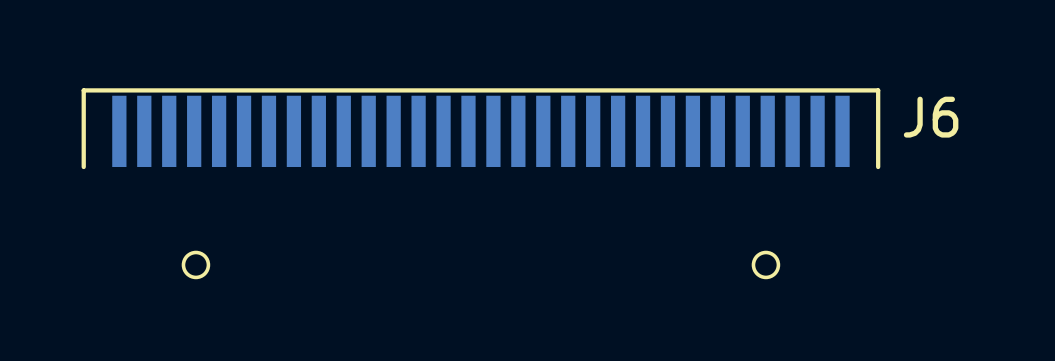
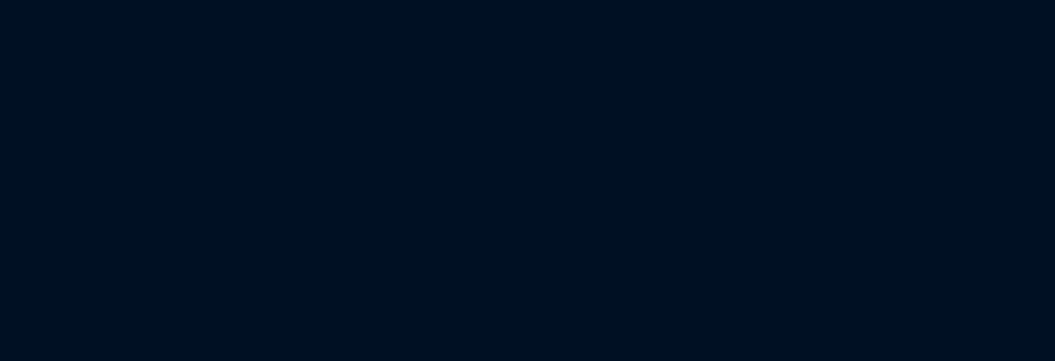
J6: (480, 183) -> none

